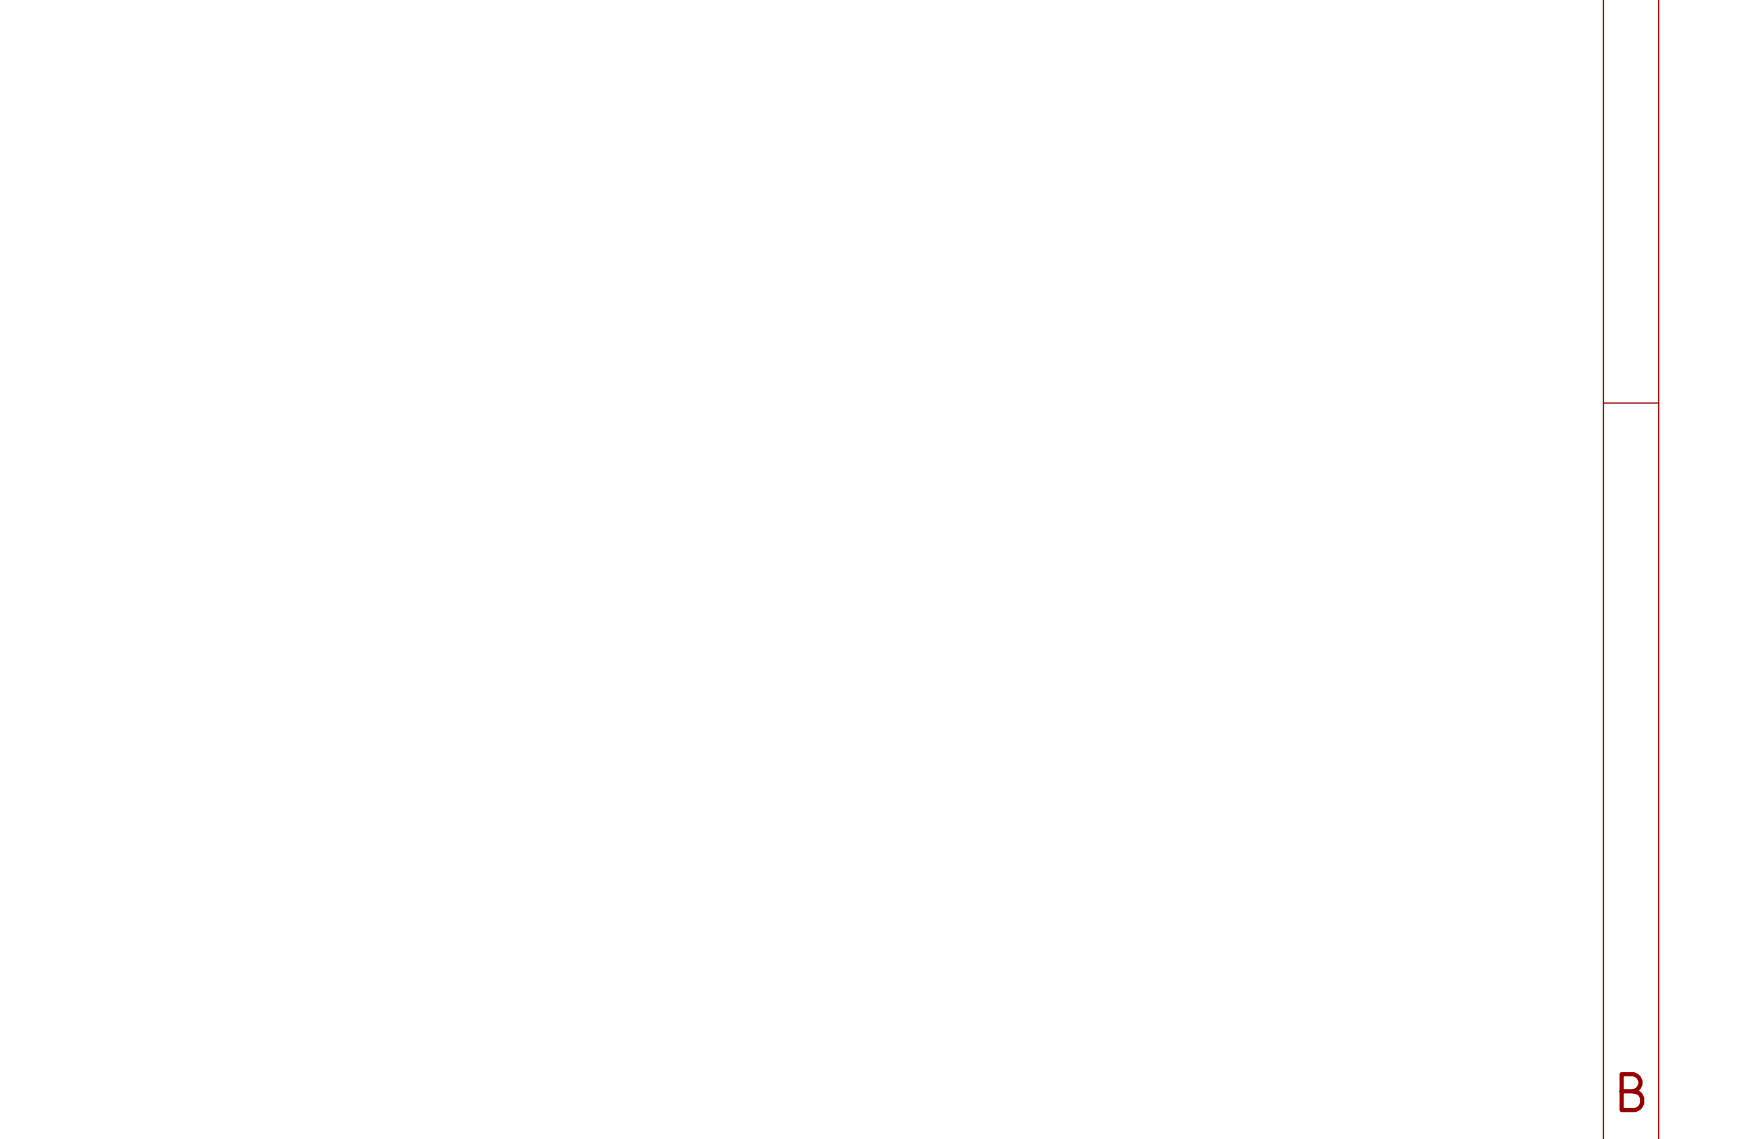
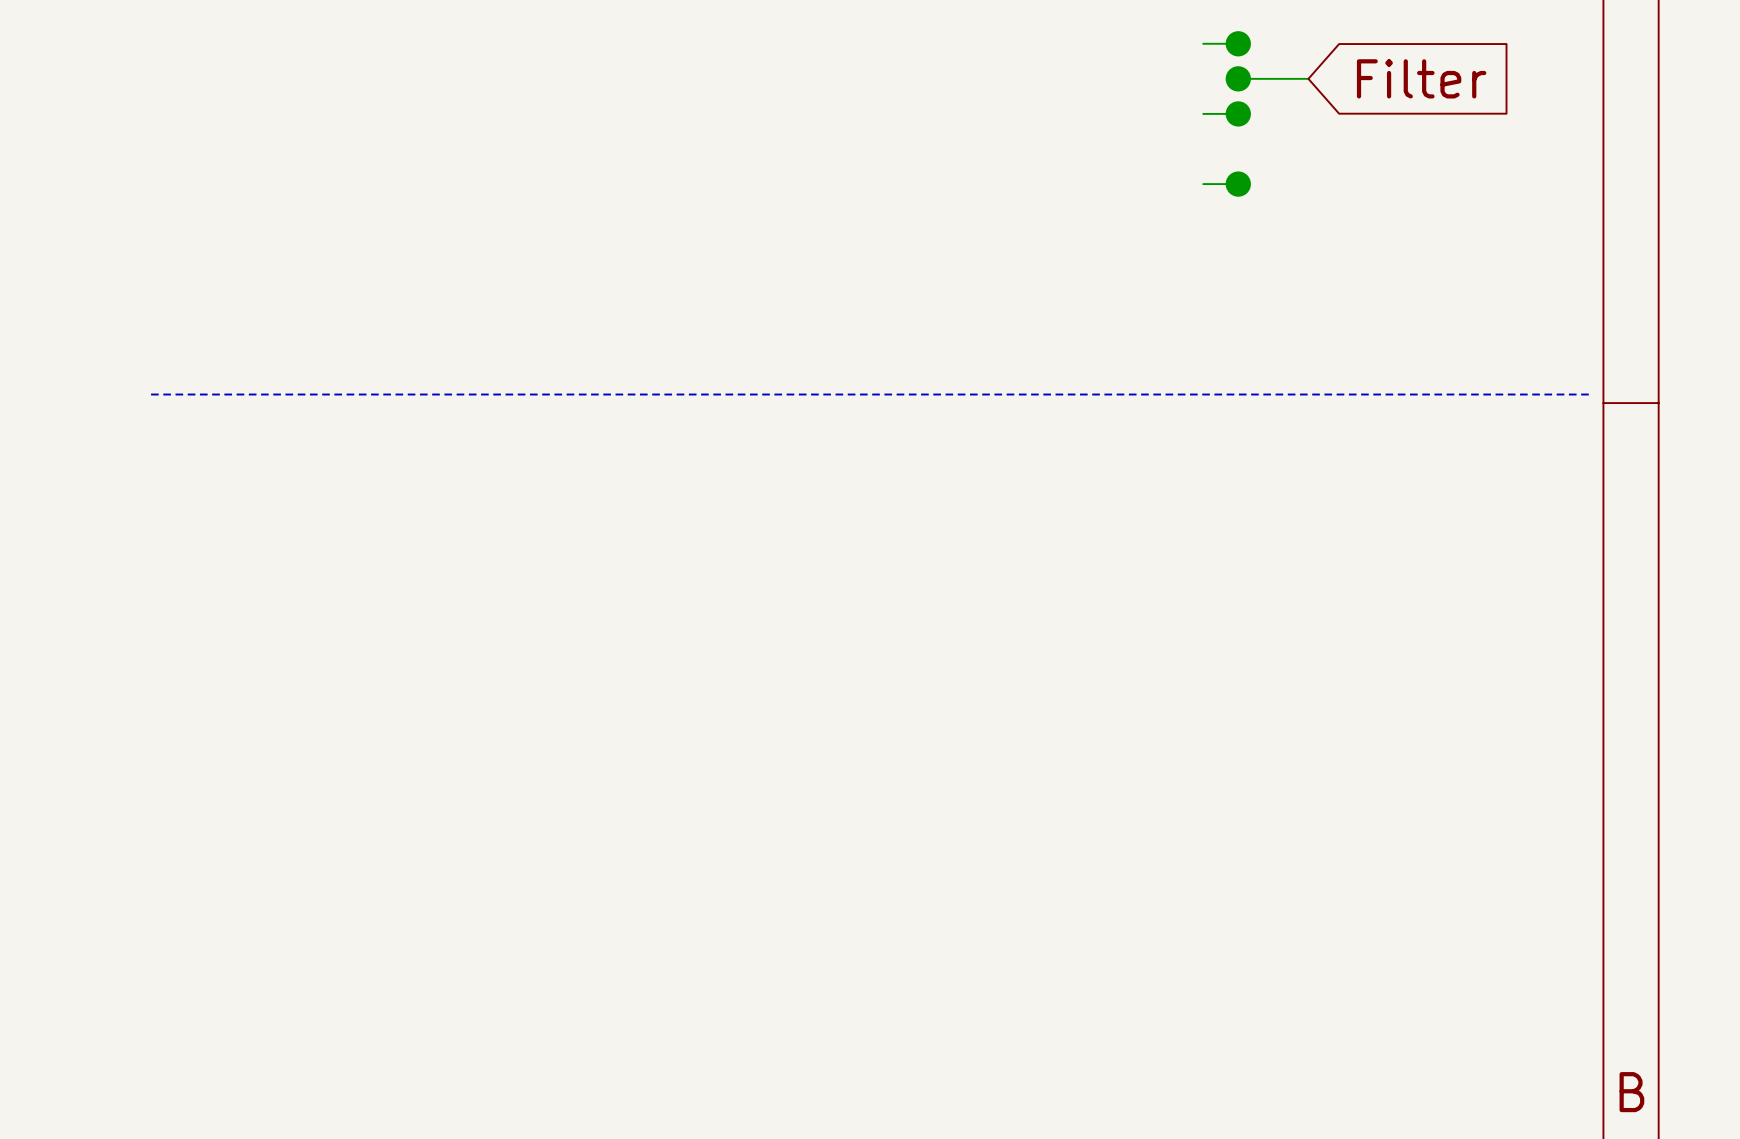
wire: none -> (1203, 43) (1238, 43)
junction: none -> (1238, 43)
wire: none -> (1238, 78) (1308, 78)
junction: none -> (1238, 78)
global label: none -> Filter (1421, 78)
wire: none -> (1203, 113) (1238, 113)
junction: none -> (1238, 113)
wire: none -> (1203, 184) (1238, 184)
junction: none -> (1238, 184)
line: none -> (151, 394) (1589, 394)

